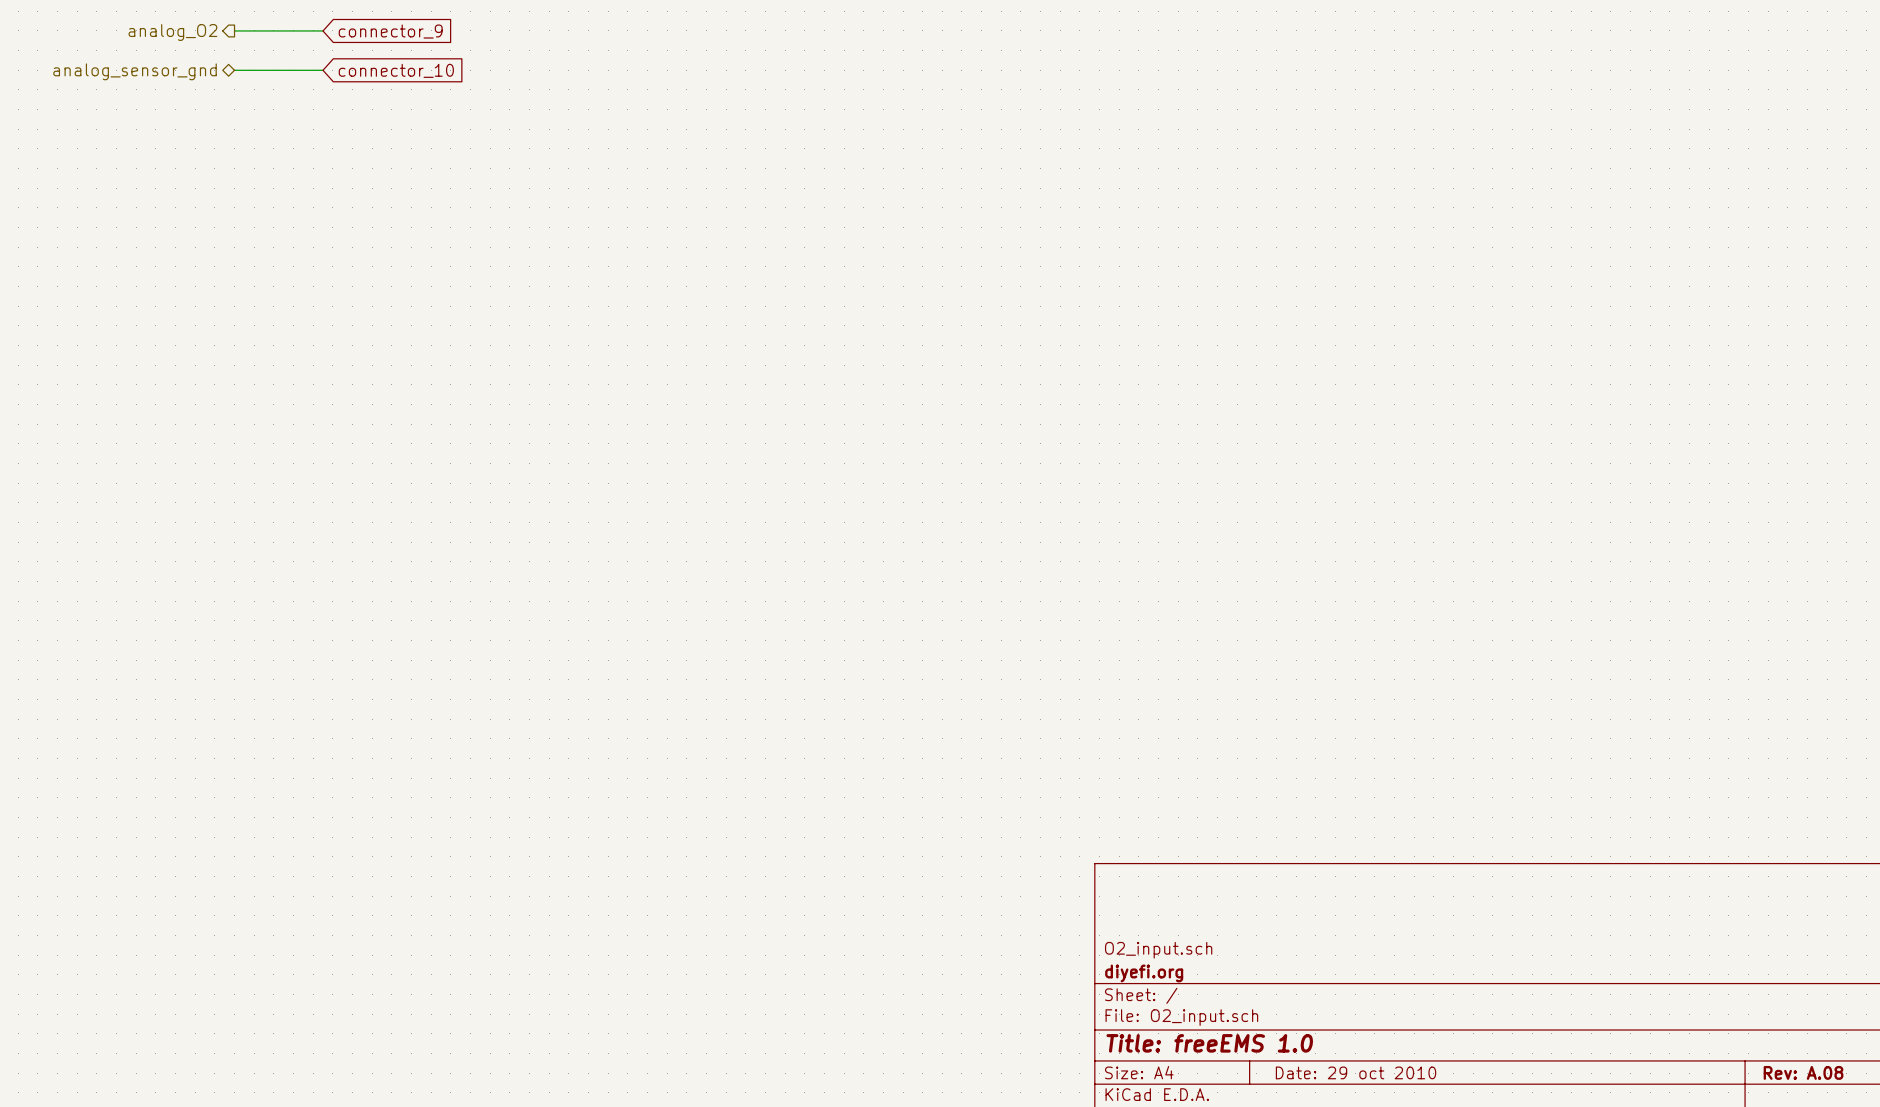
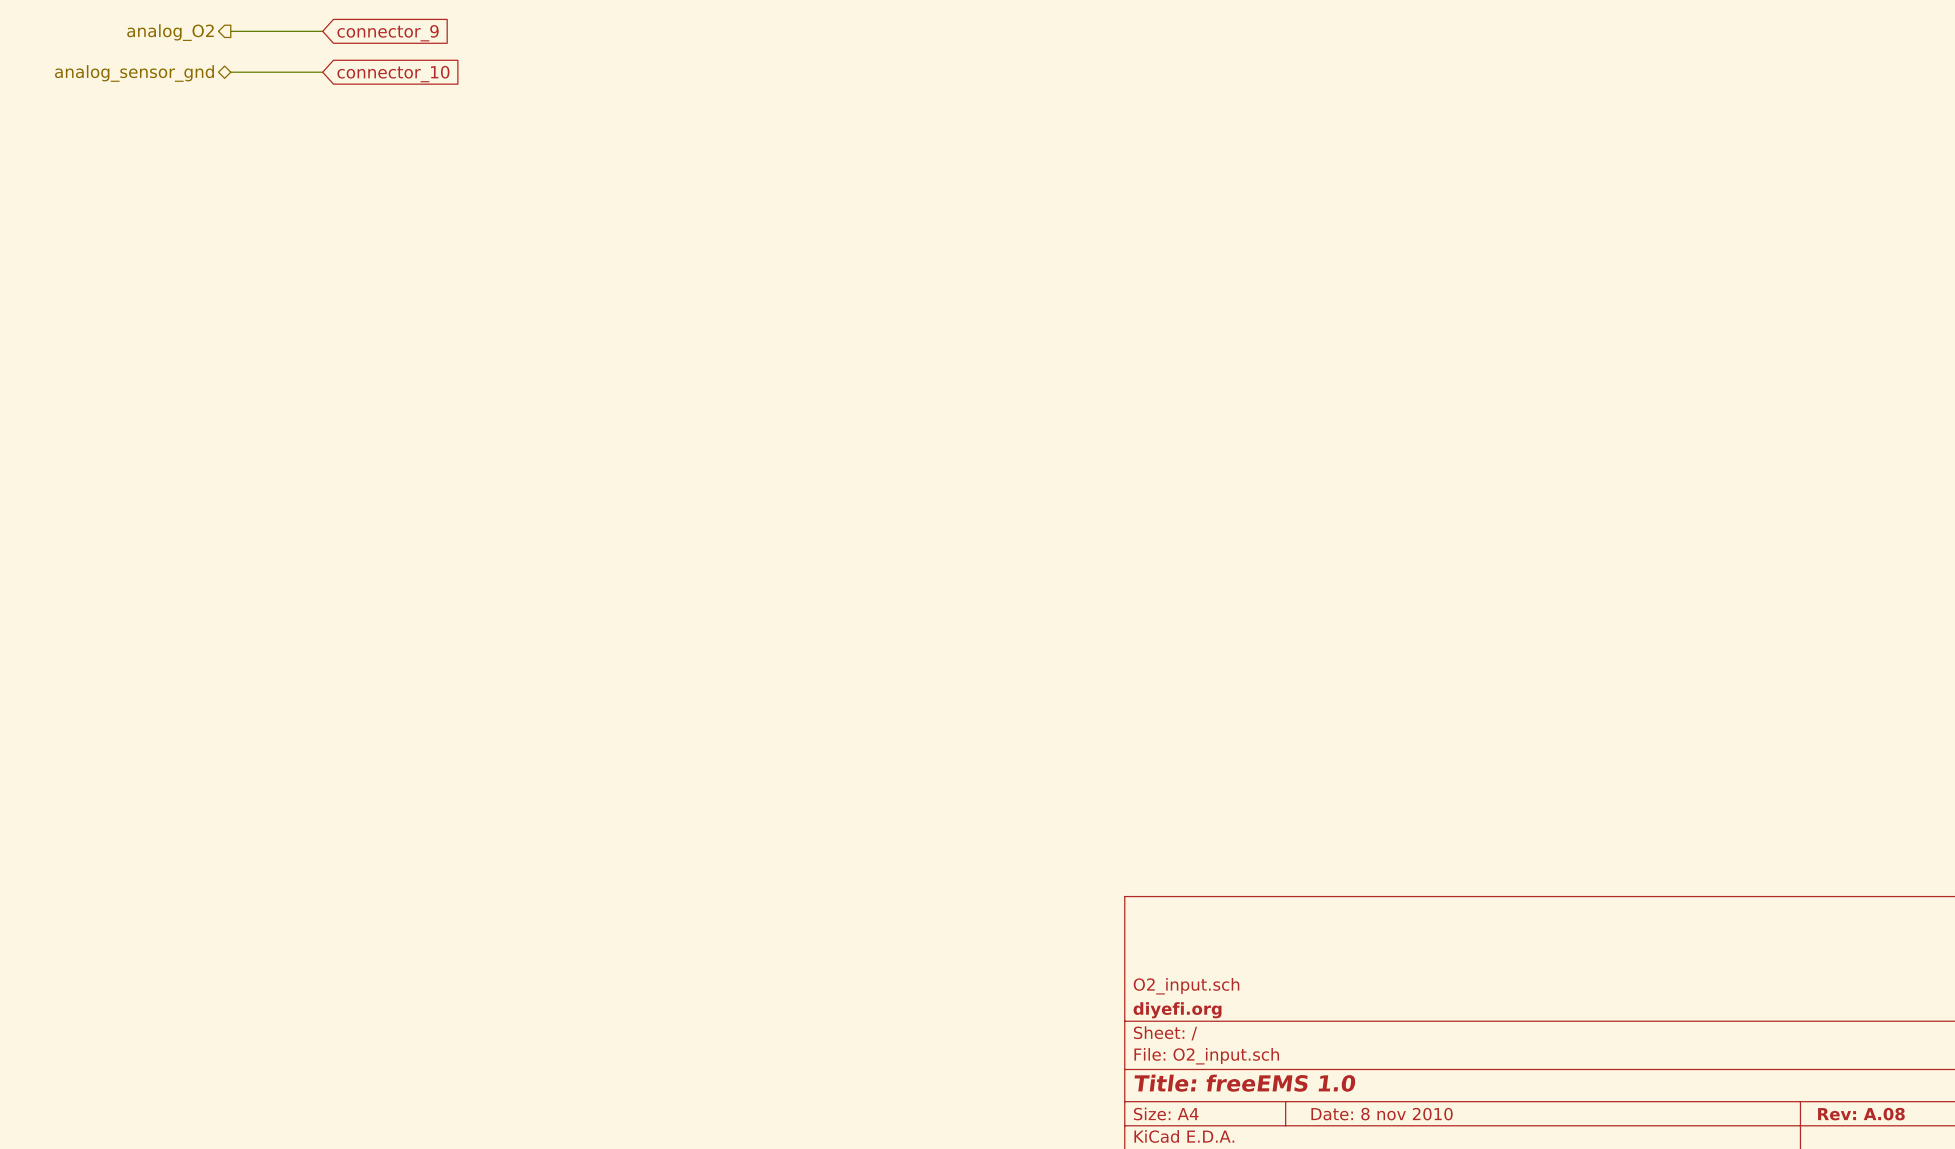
title block: Date: 29 oct 2010 (1356, 1072) -> Date: 8 nov 2010 (1382, 1114)

